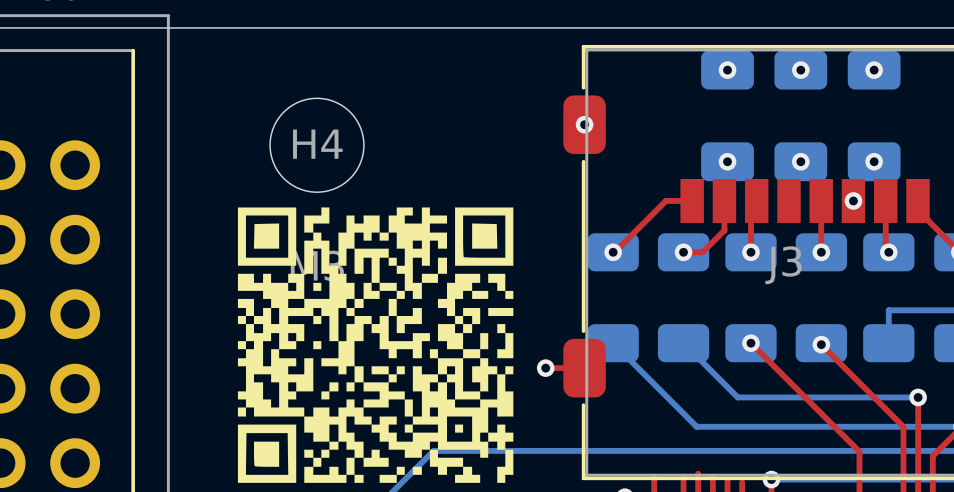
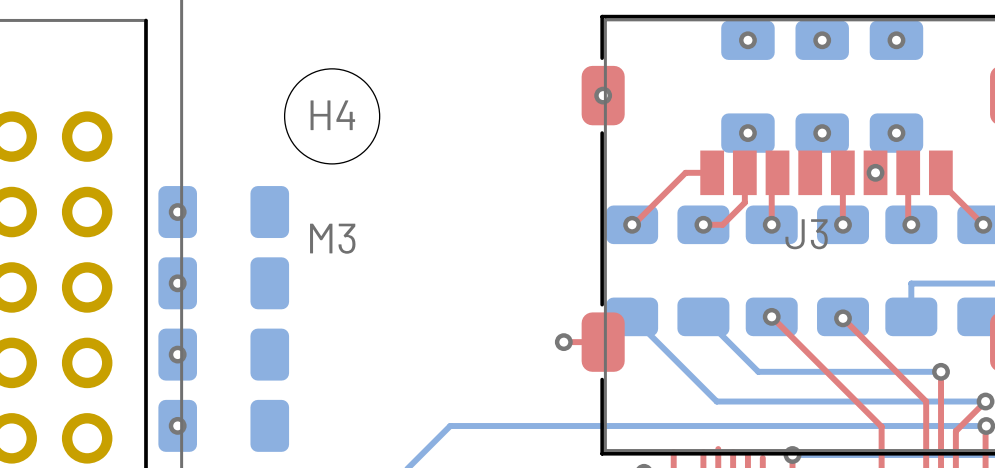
drawing: [237, 207, 514, 483] -> none
via: none -> (177, 212)
part: none -> (223, 212)
via: none -> (177, 283)
part: none -> (223, 283)
via: none -> (177, 354)
part: none -> (223, 354)
via: none -> (177, 425)
part: none -> (223, 425)

